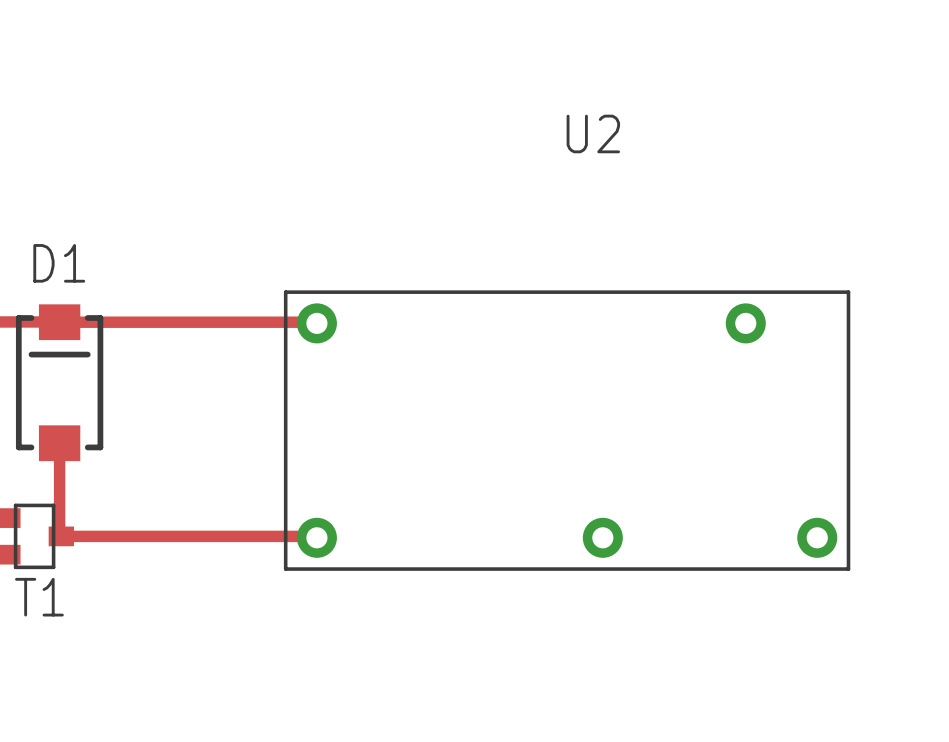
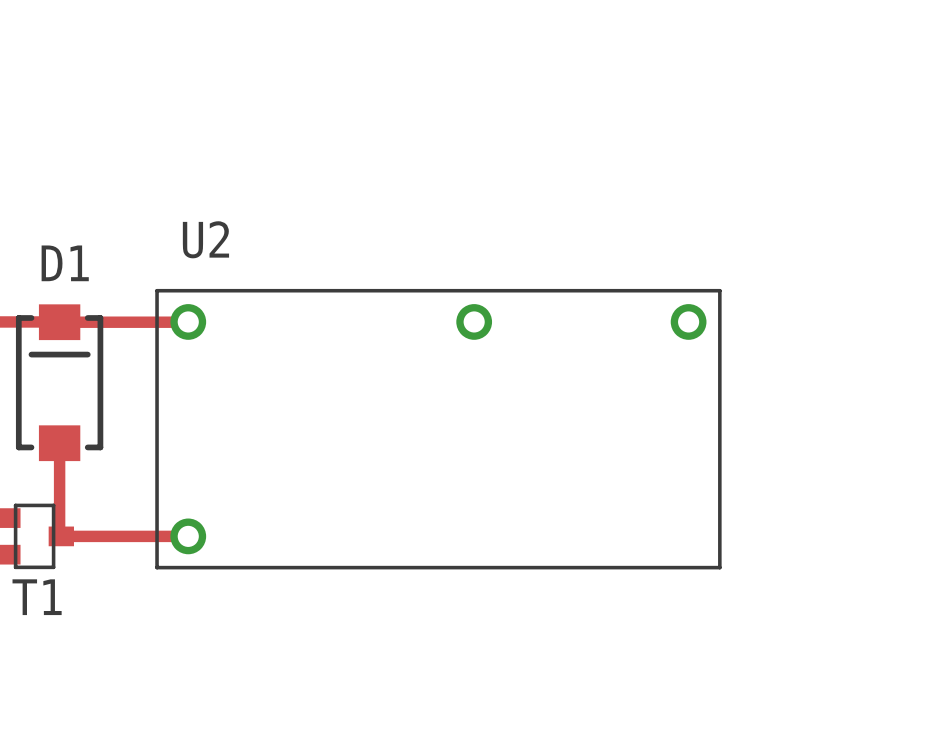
U2 name position: U2 (593, 133) -> U2 (205, 239)
U2 footprint: [283, 290, 851, 571] -> [155, 288, 722, 570]
track: (188, 322) (316, 323) -> none
track: (188, 536) (316, 537) -> none

